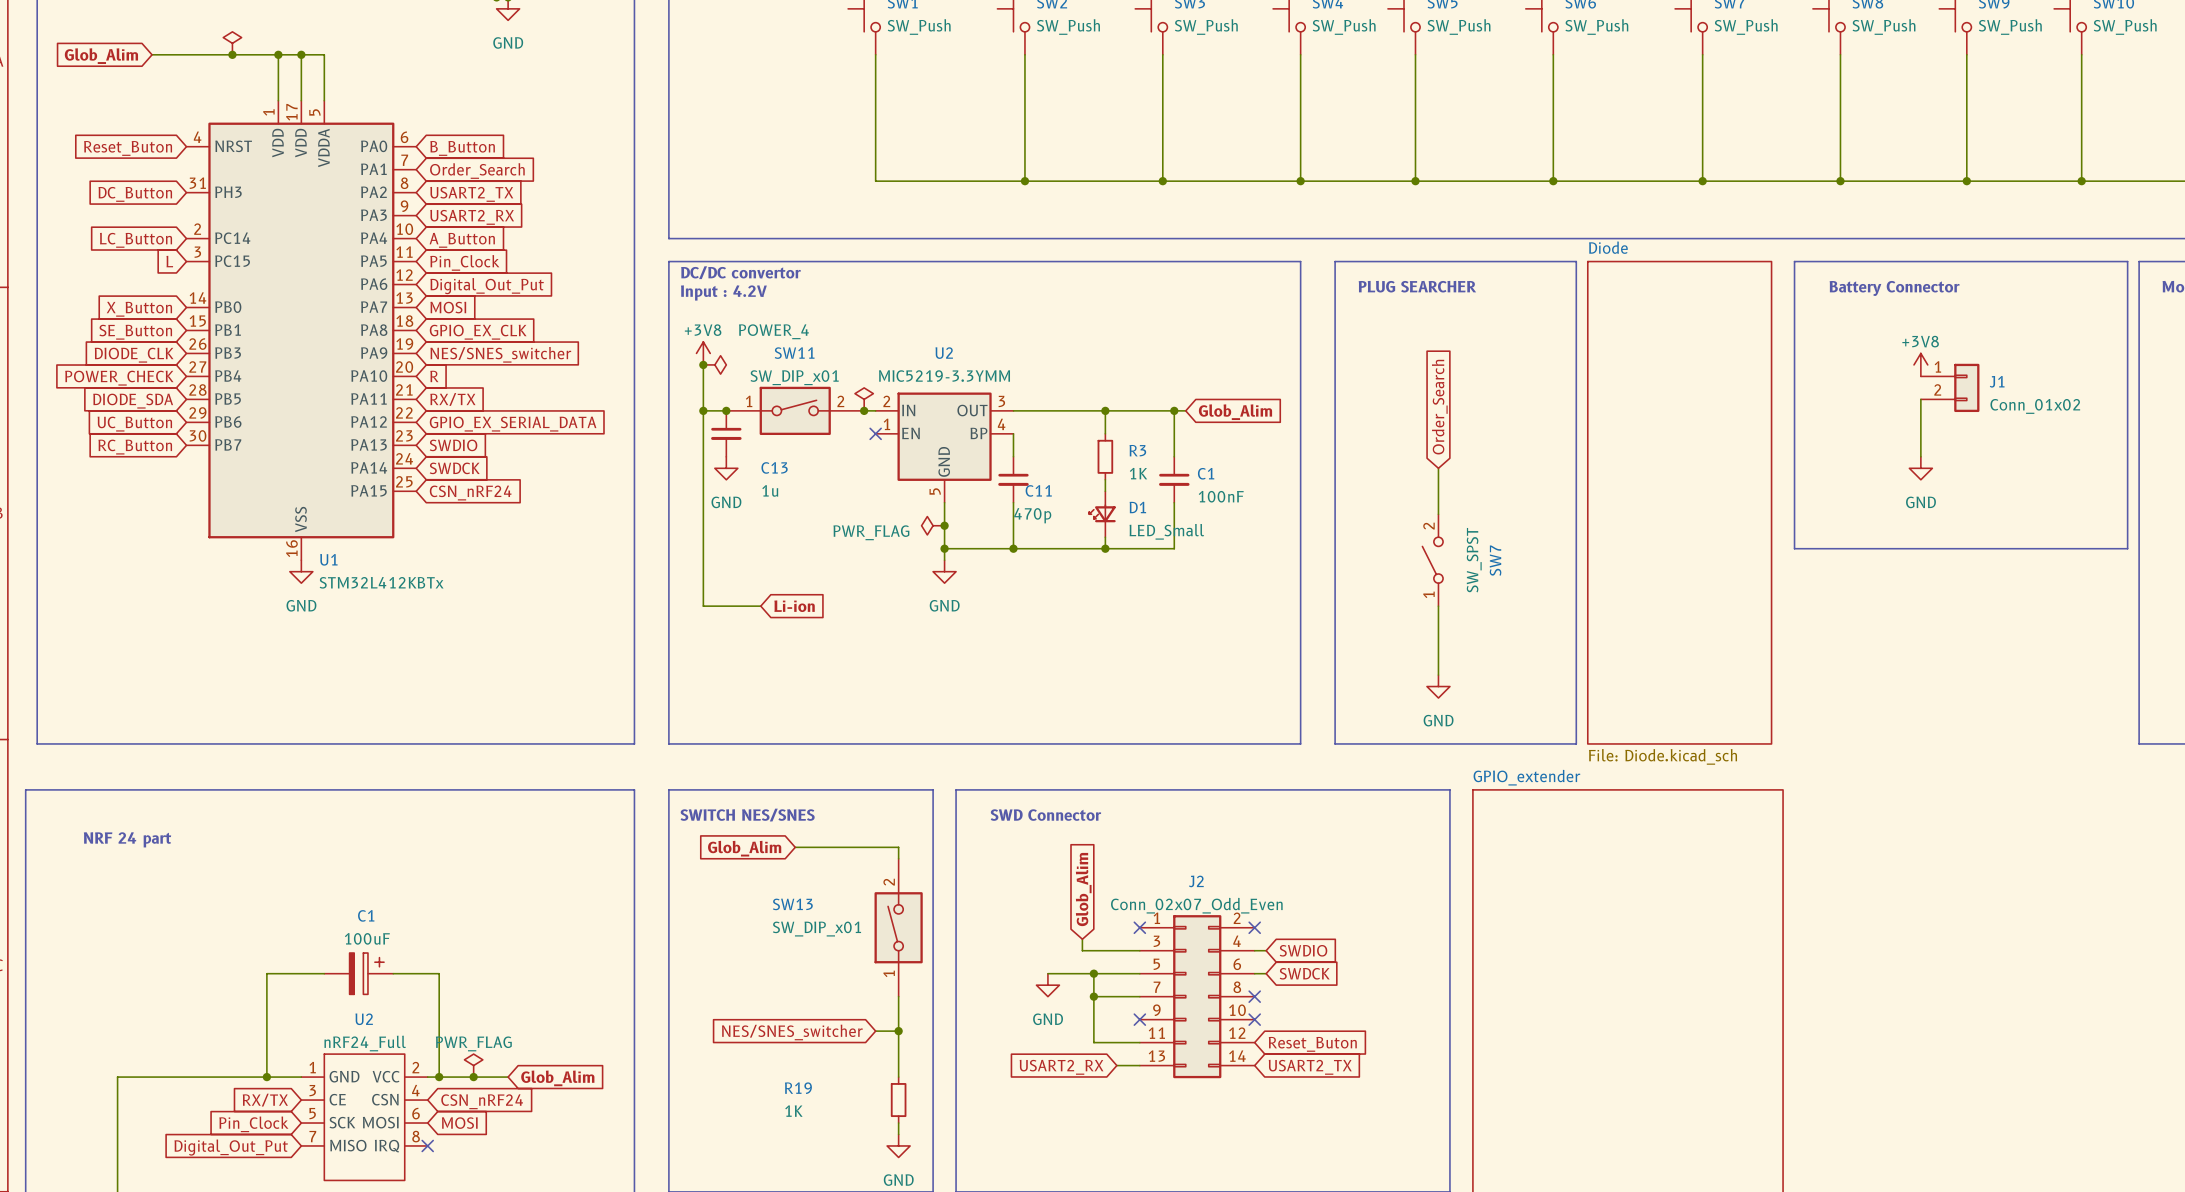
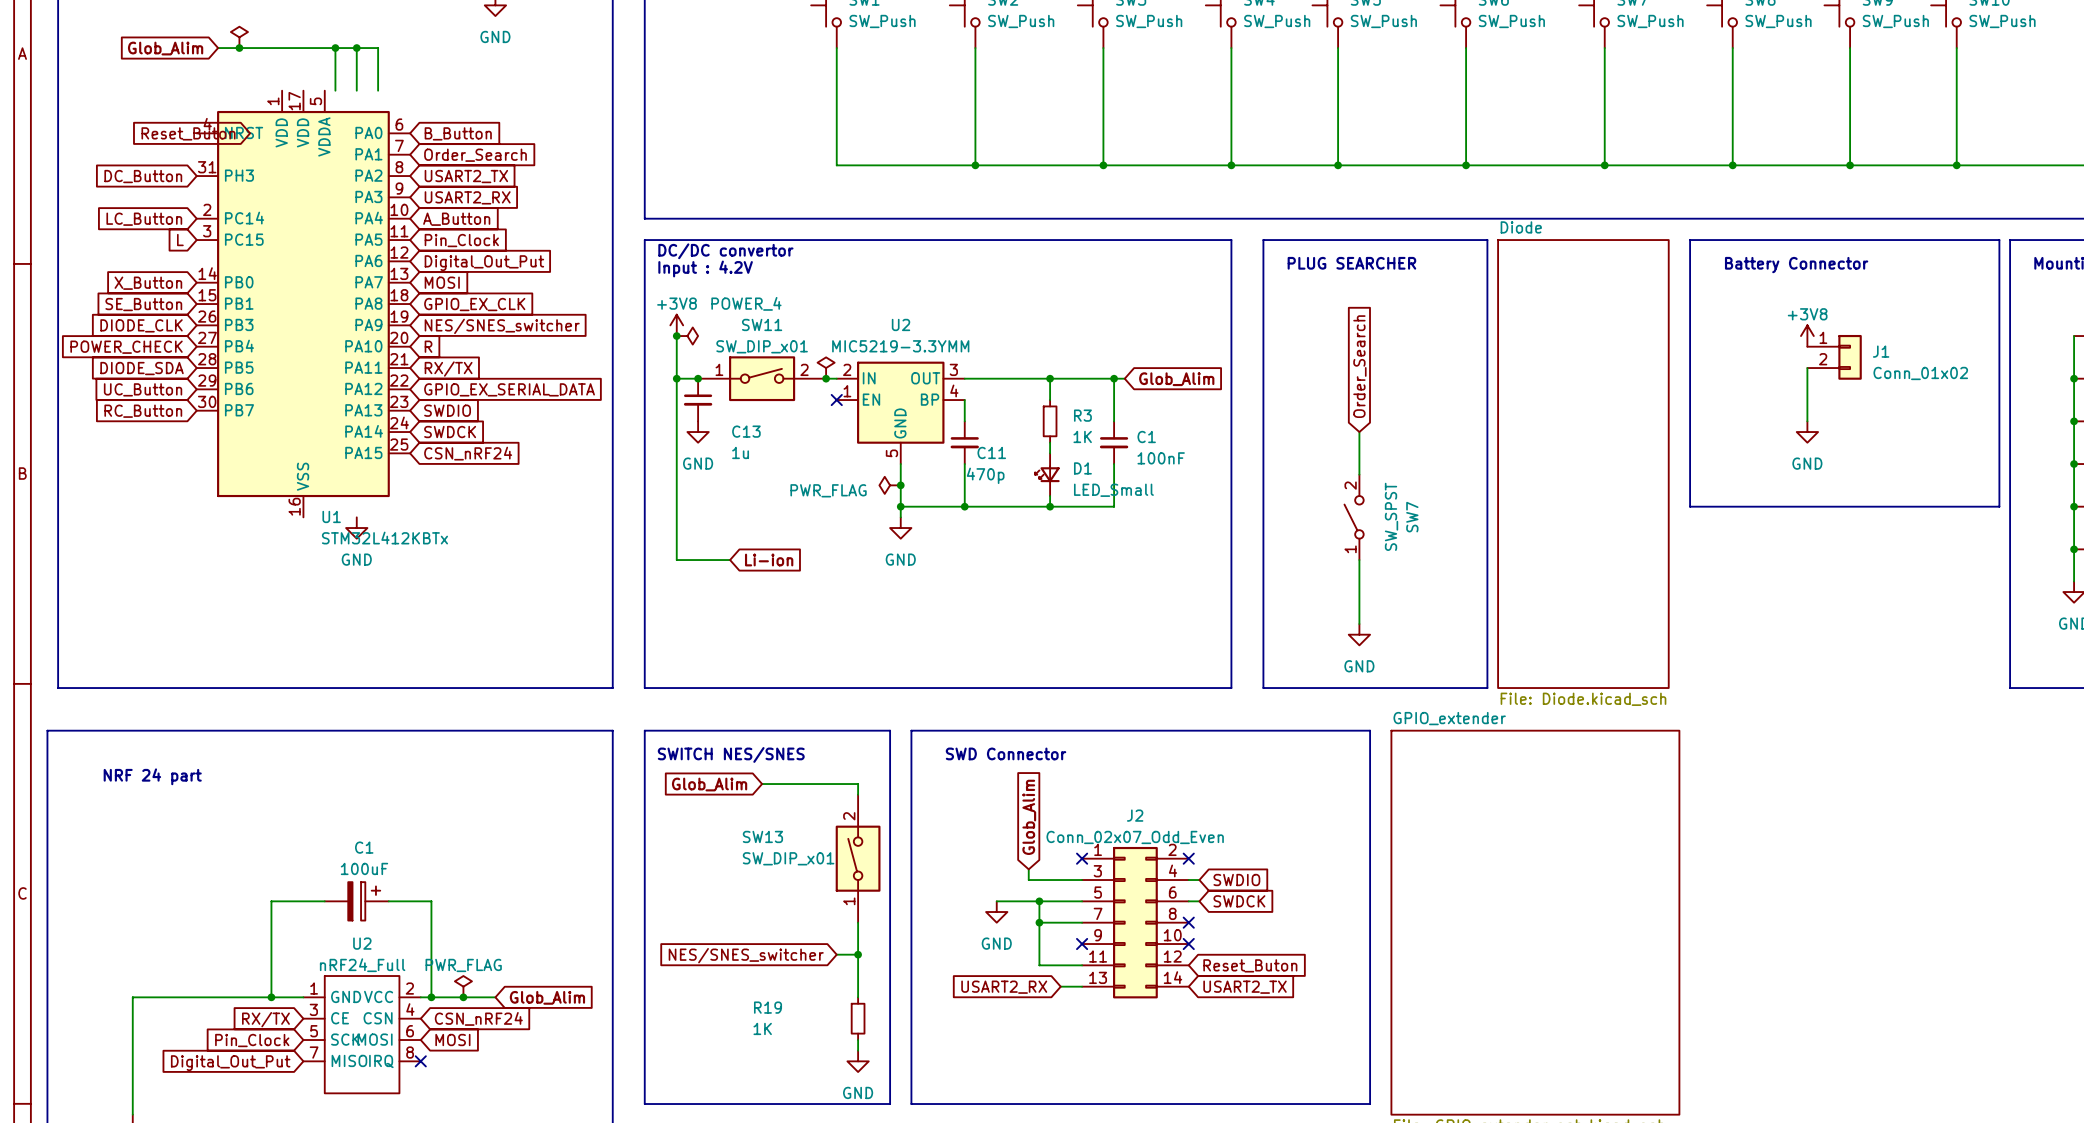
wire: (152, 54) (209, 54) -> none
wire: (278, 54) (278, 100) -> (356, 48) (356, 90)
junction: (278, 54) -> none
wire: (301, 54) (301, 100) -> (335, 48) (335, 90)
junction: (301, 54) -> none
wire: (324, 54) (324, 100) -> (324, 48) (378, 48) (378, 90)
junction: none -> (335, 48)
junction: none -> (356, 48)
global label position: Glob_Alim (101, 56) -> Glob_Alim (165, 48)
global label position: Reset_Buton (128, 148) -> Reset_Buton (188, 133)
power symbol position: GND (301, 571) -> GND (356, 528)

